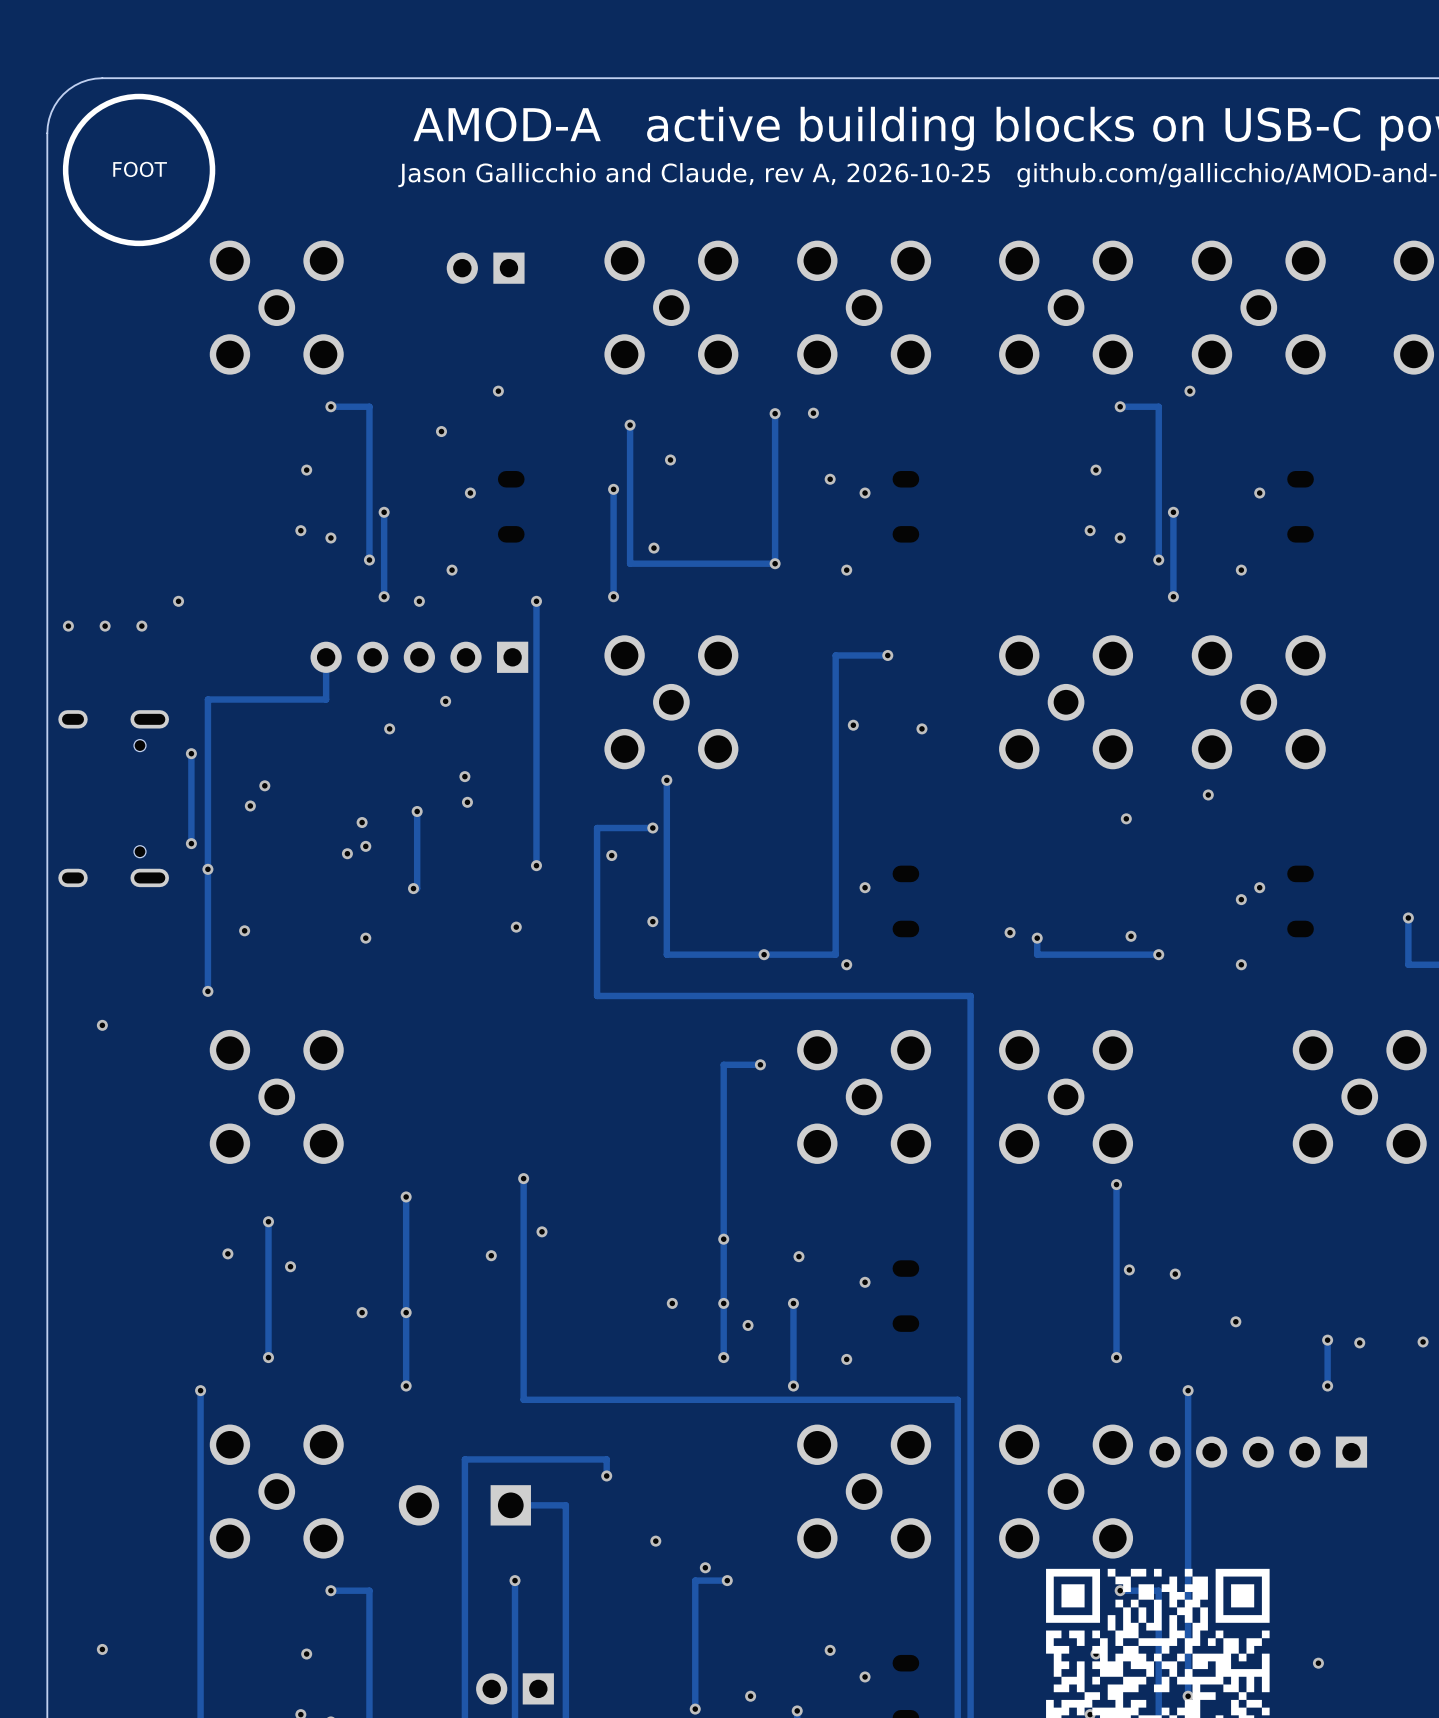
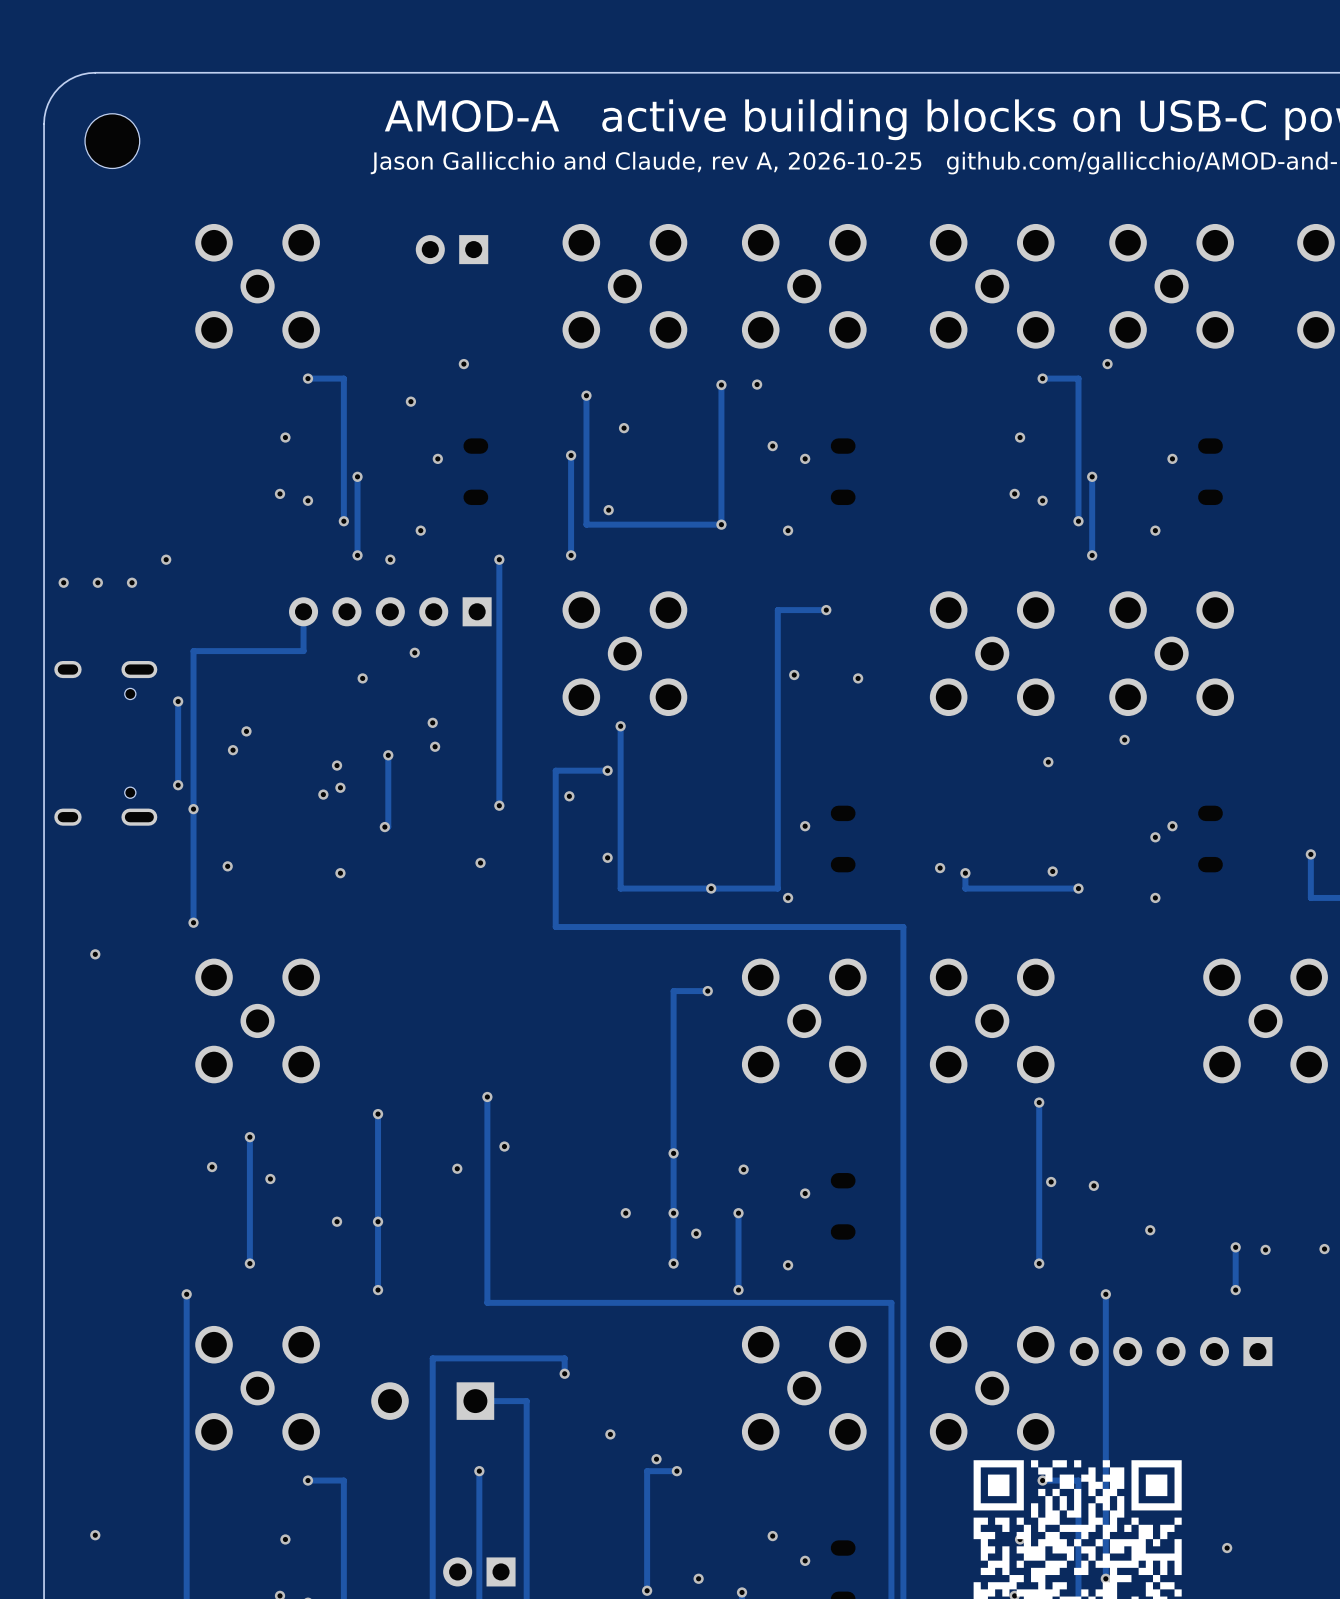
drawing: [62, 93, 216, 247] -> none
part: none -> (112, 141)
text: FOOT (140, 169) -> none

